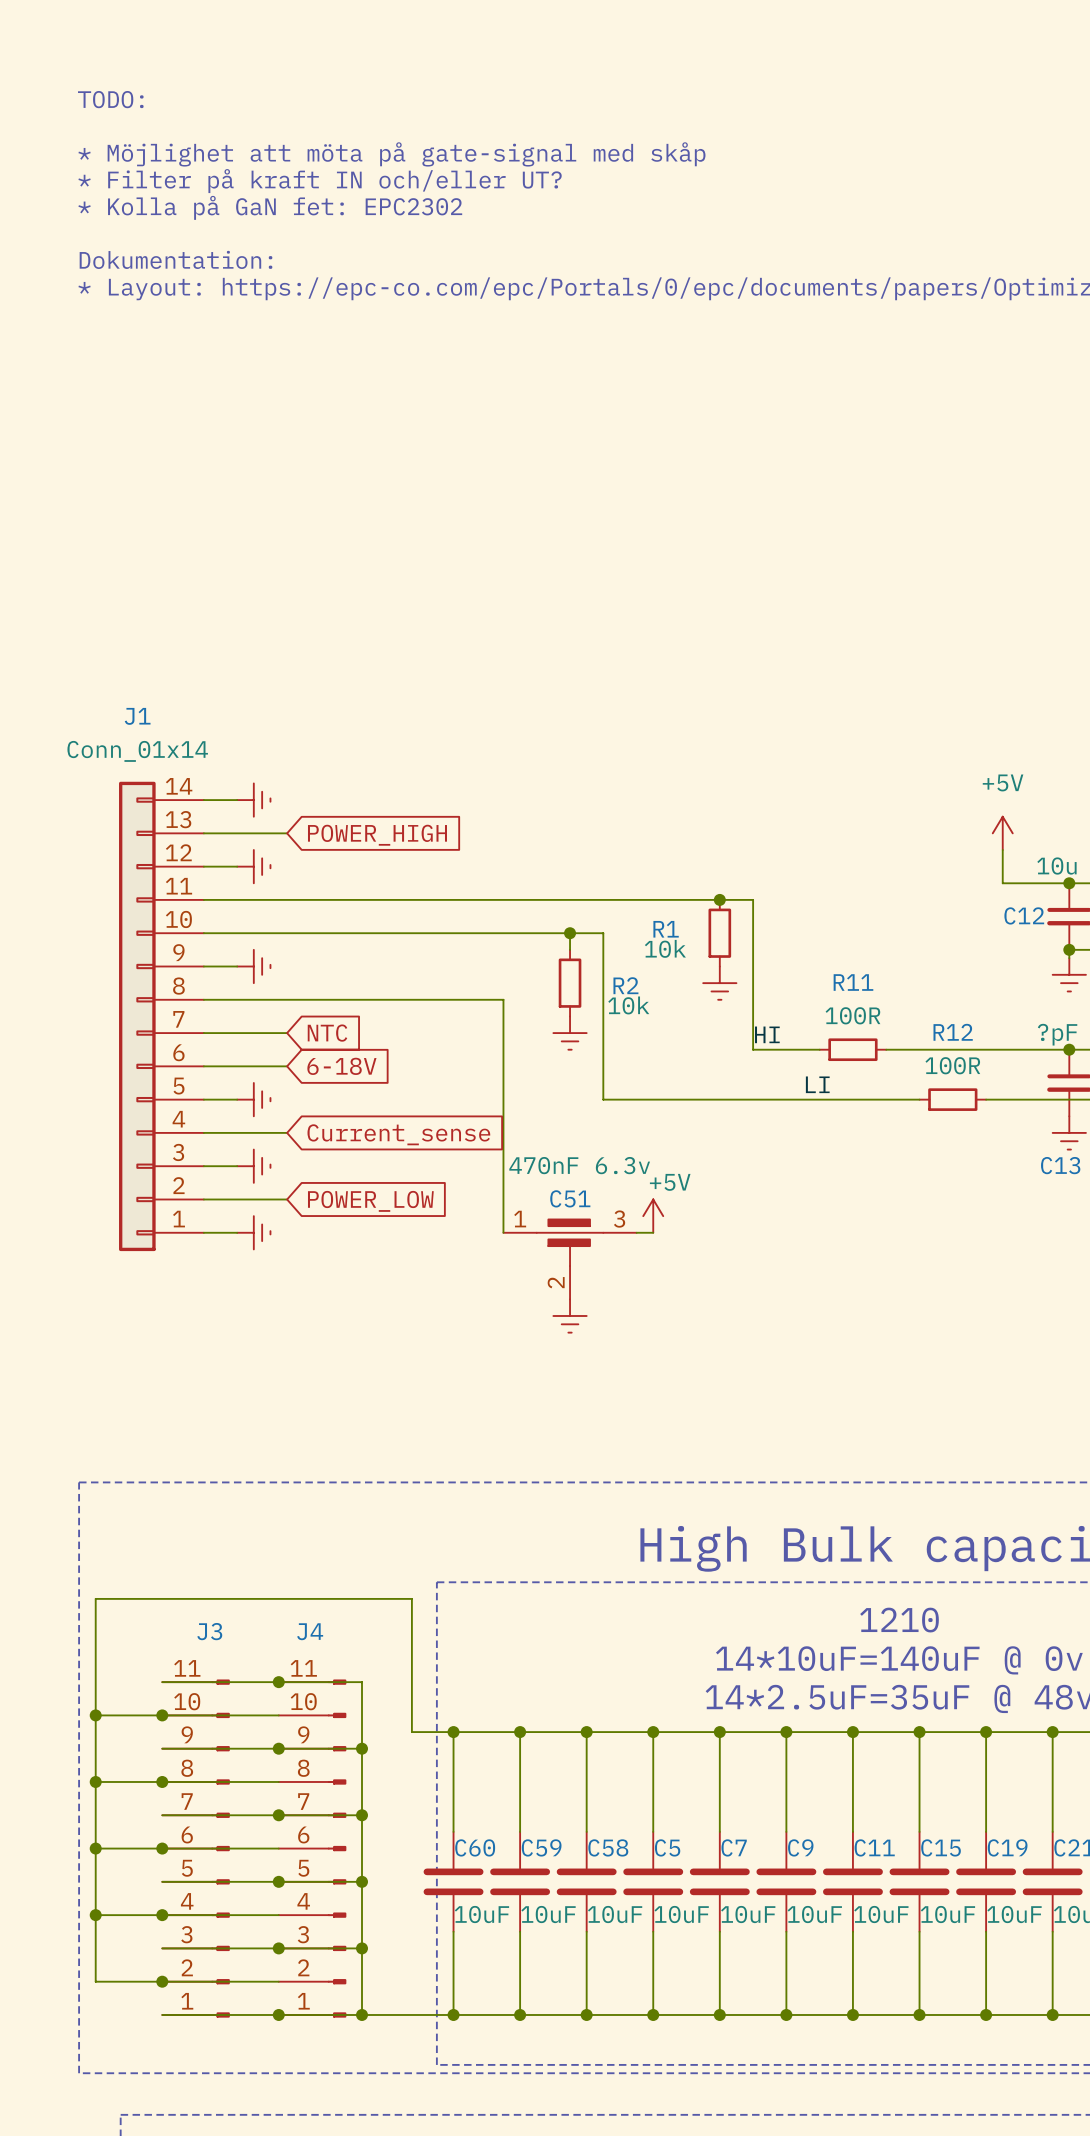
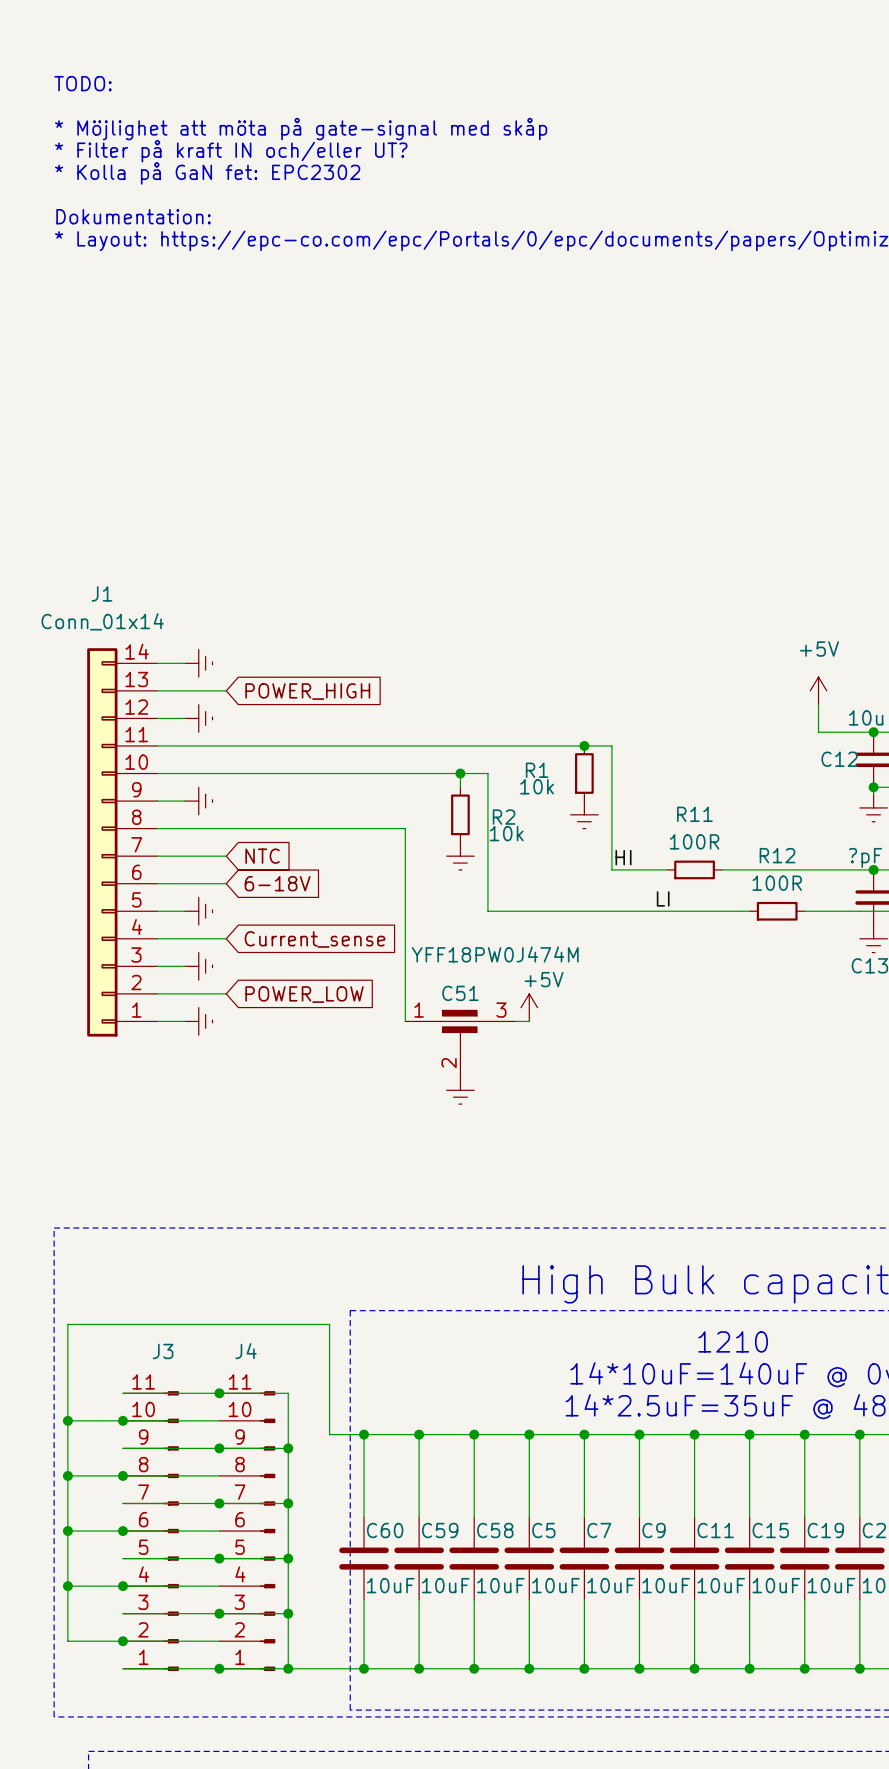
C51 value: 470nF 6.3v (579, 1165) -> YFF18PW0J474M (495, 954)

